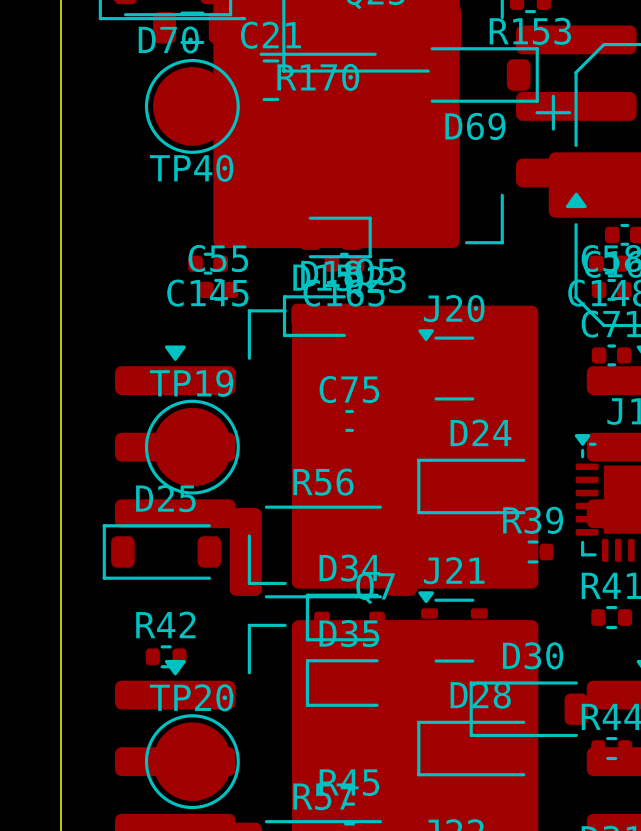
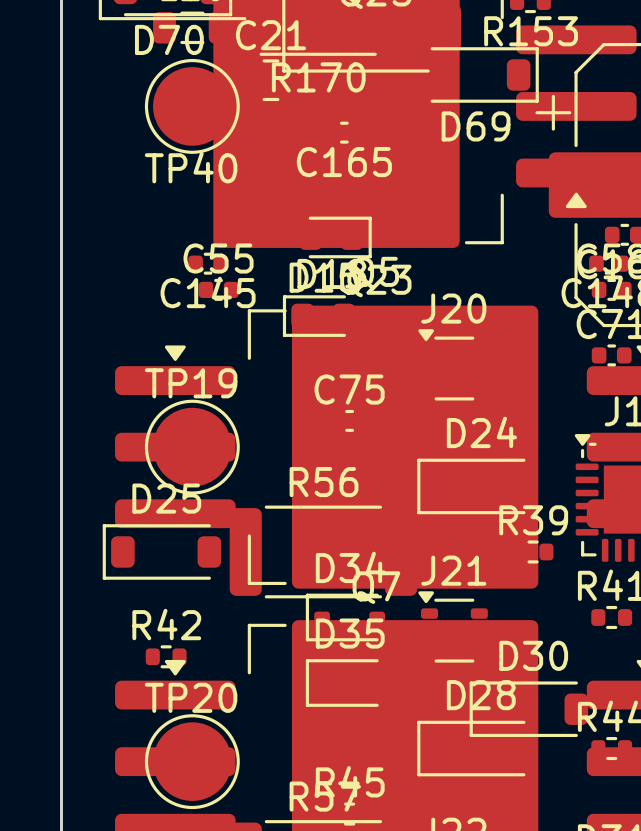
C165 position: (344, 263) -> (344, 132)

